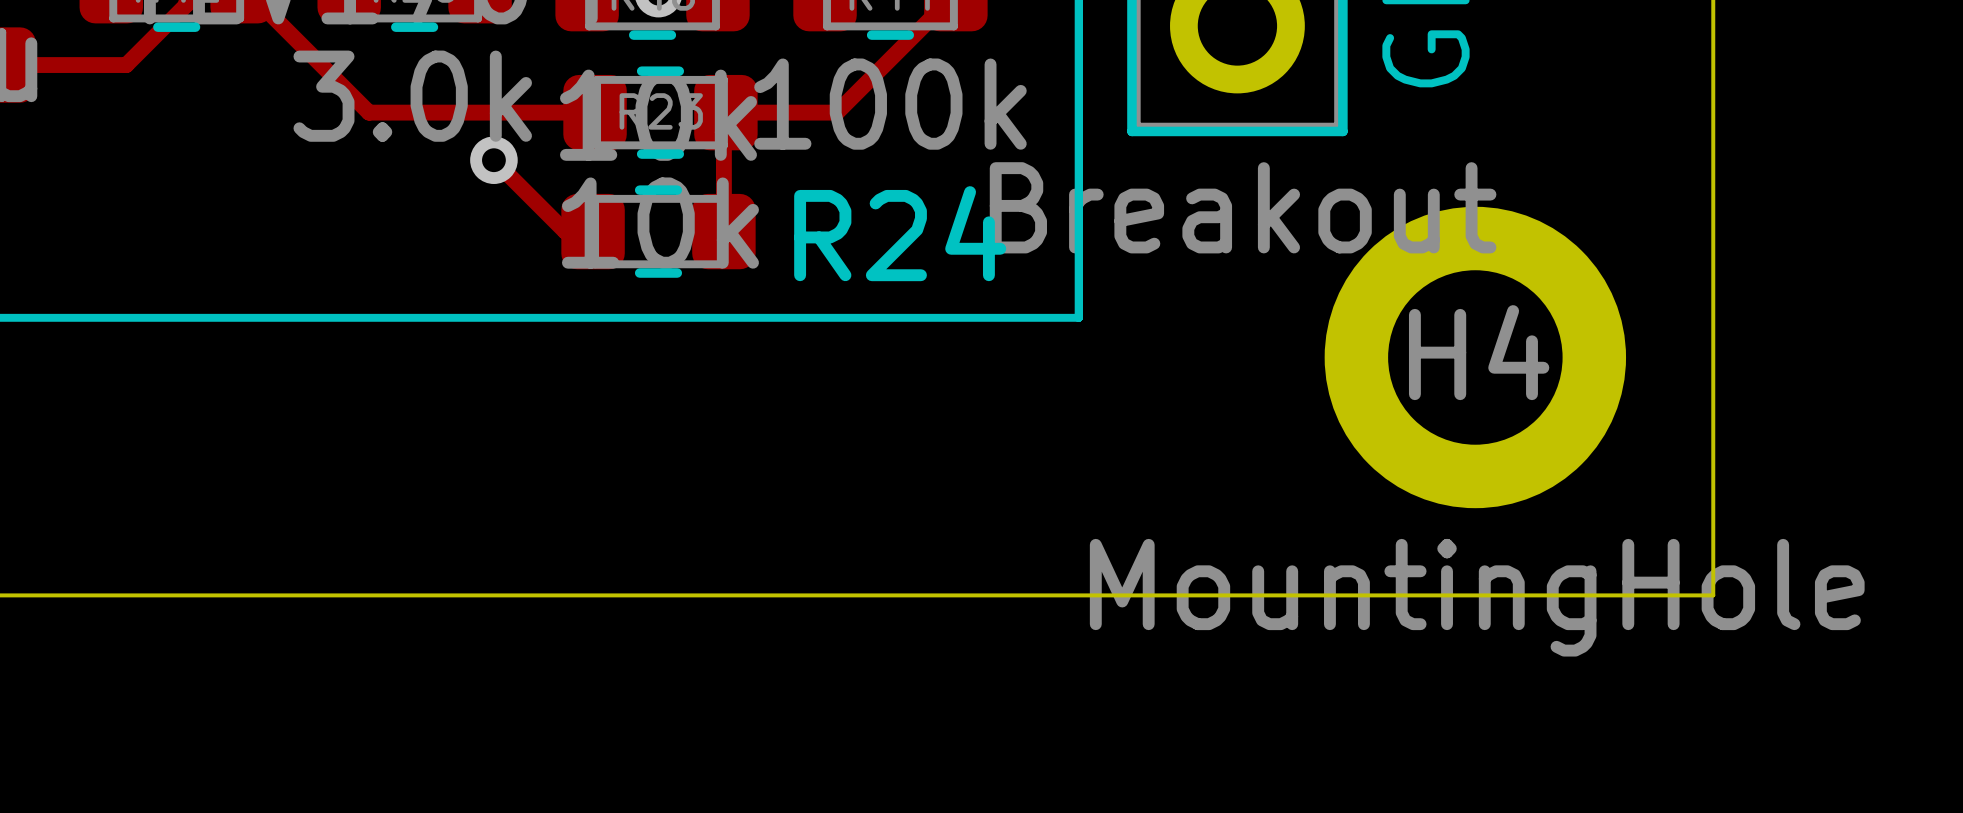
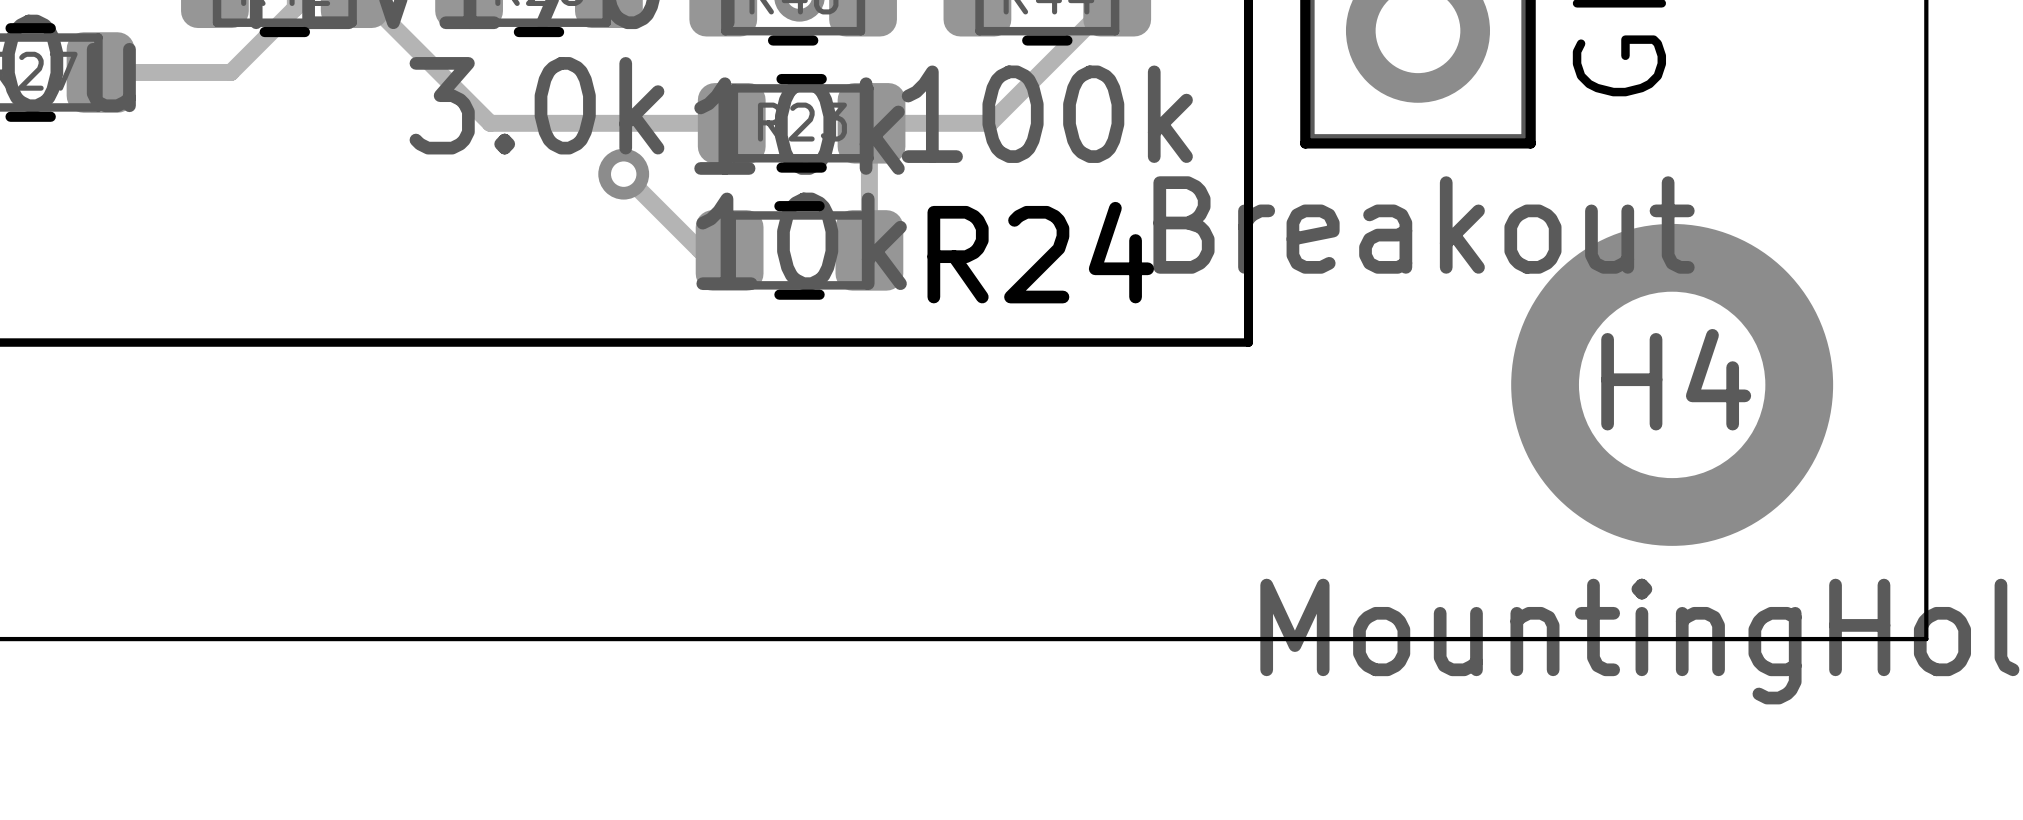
R24 name position: R24 (900, 233) -> R24 (1040, 252)

